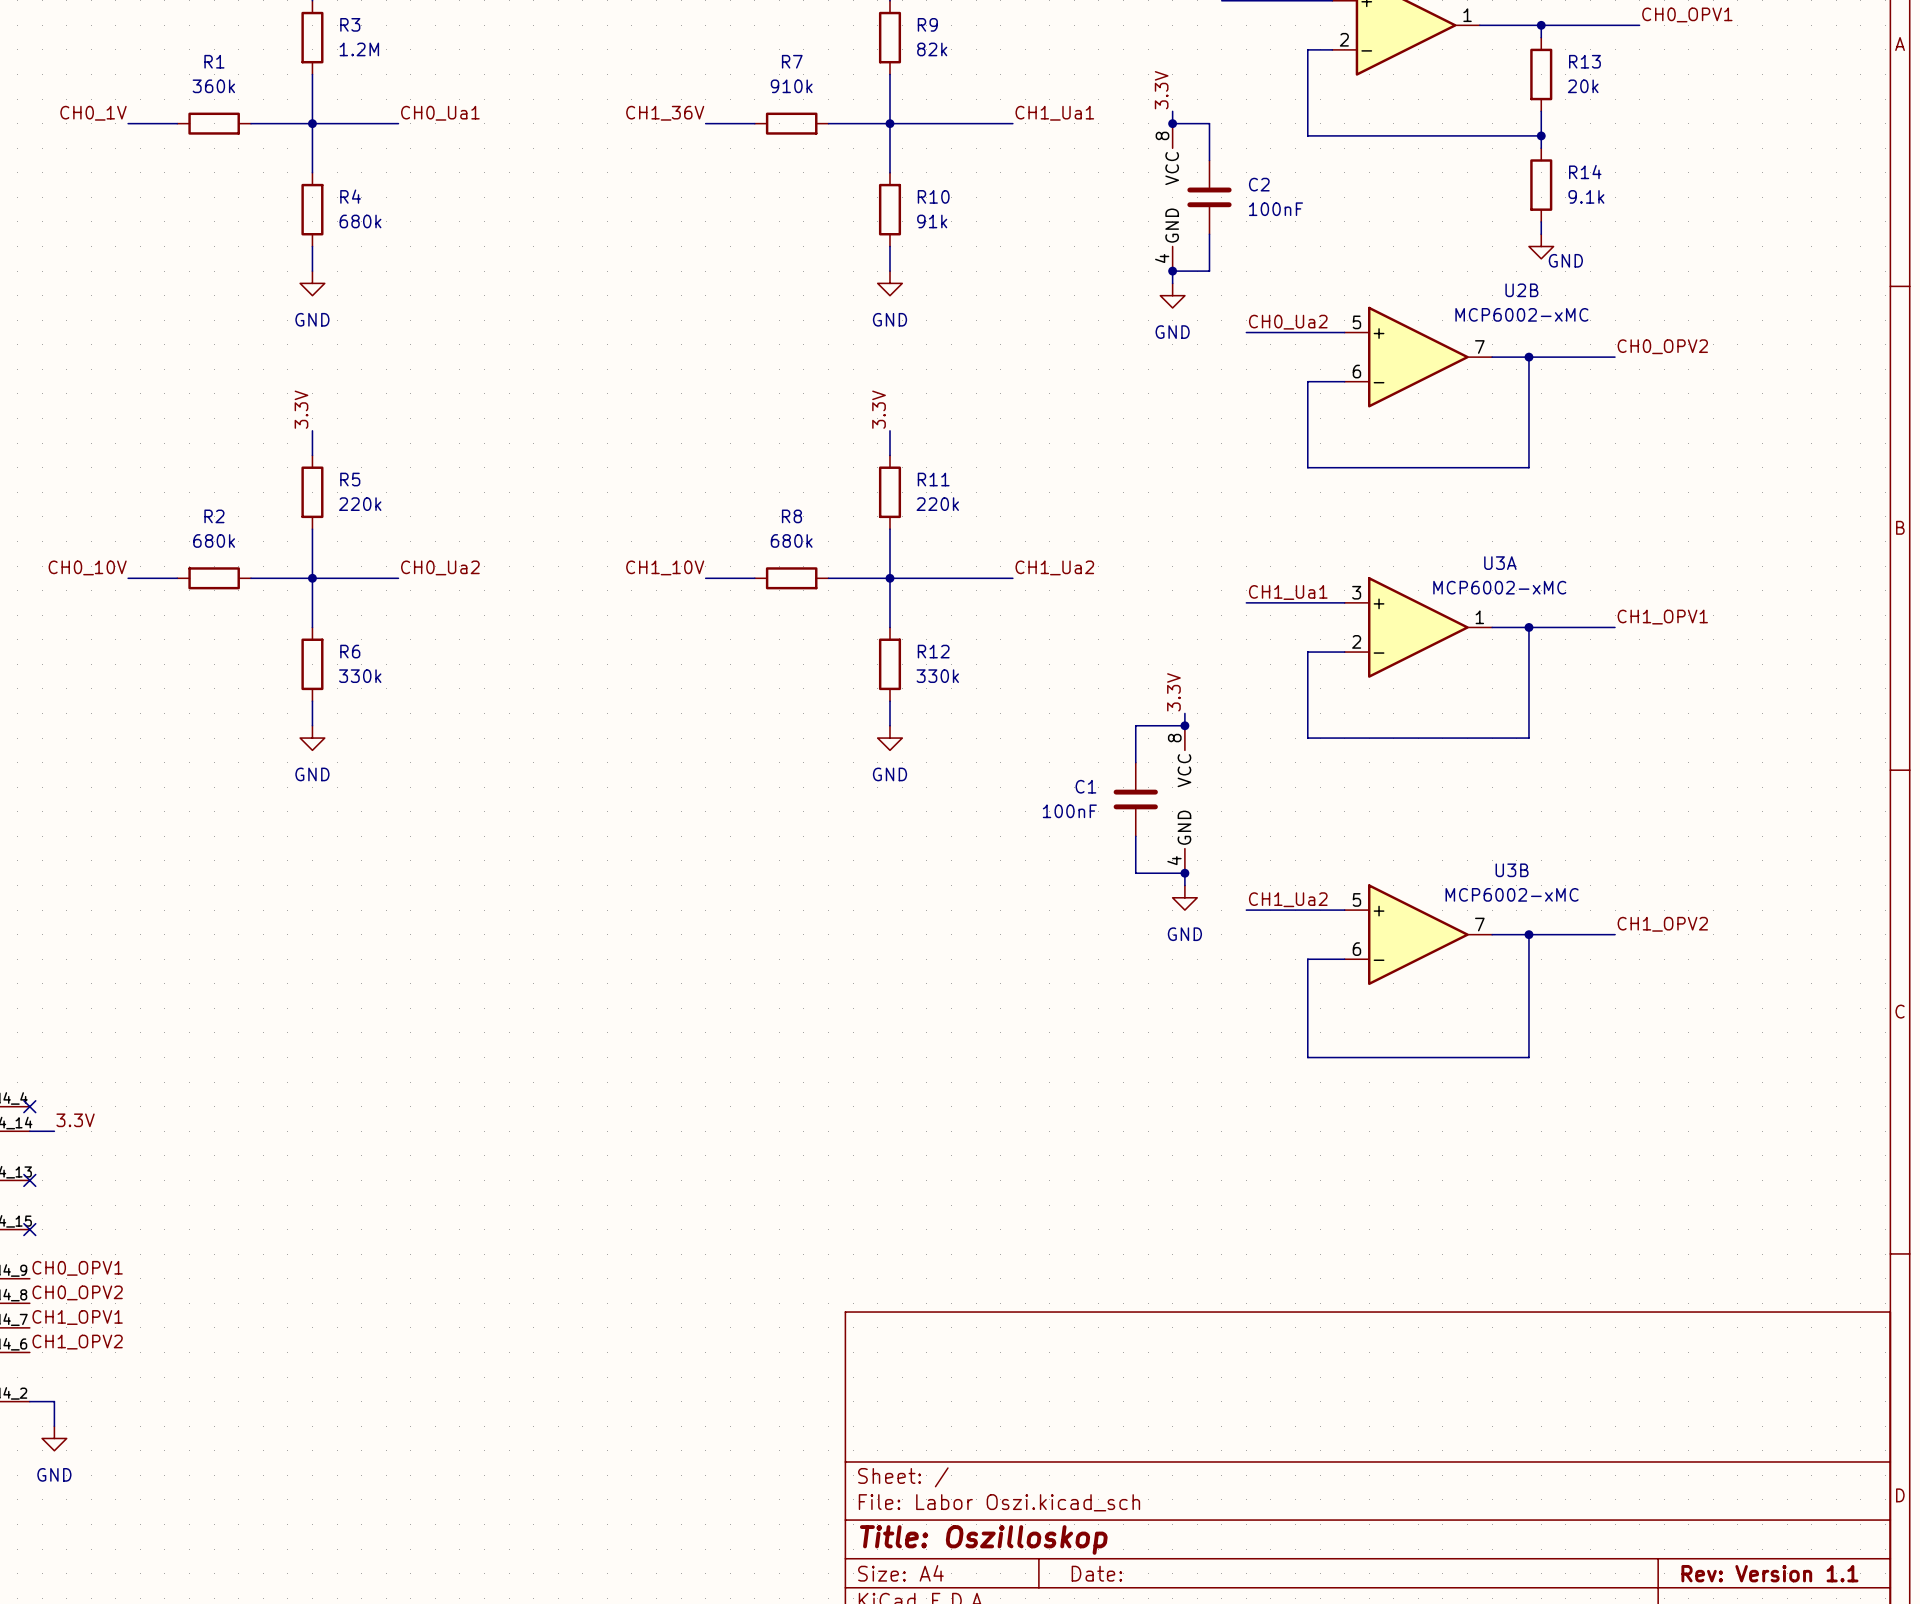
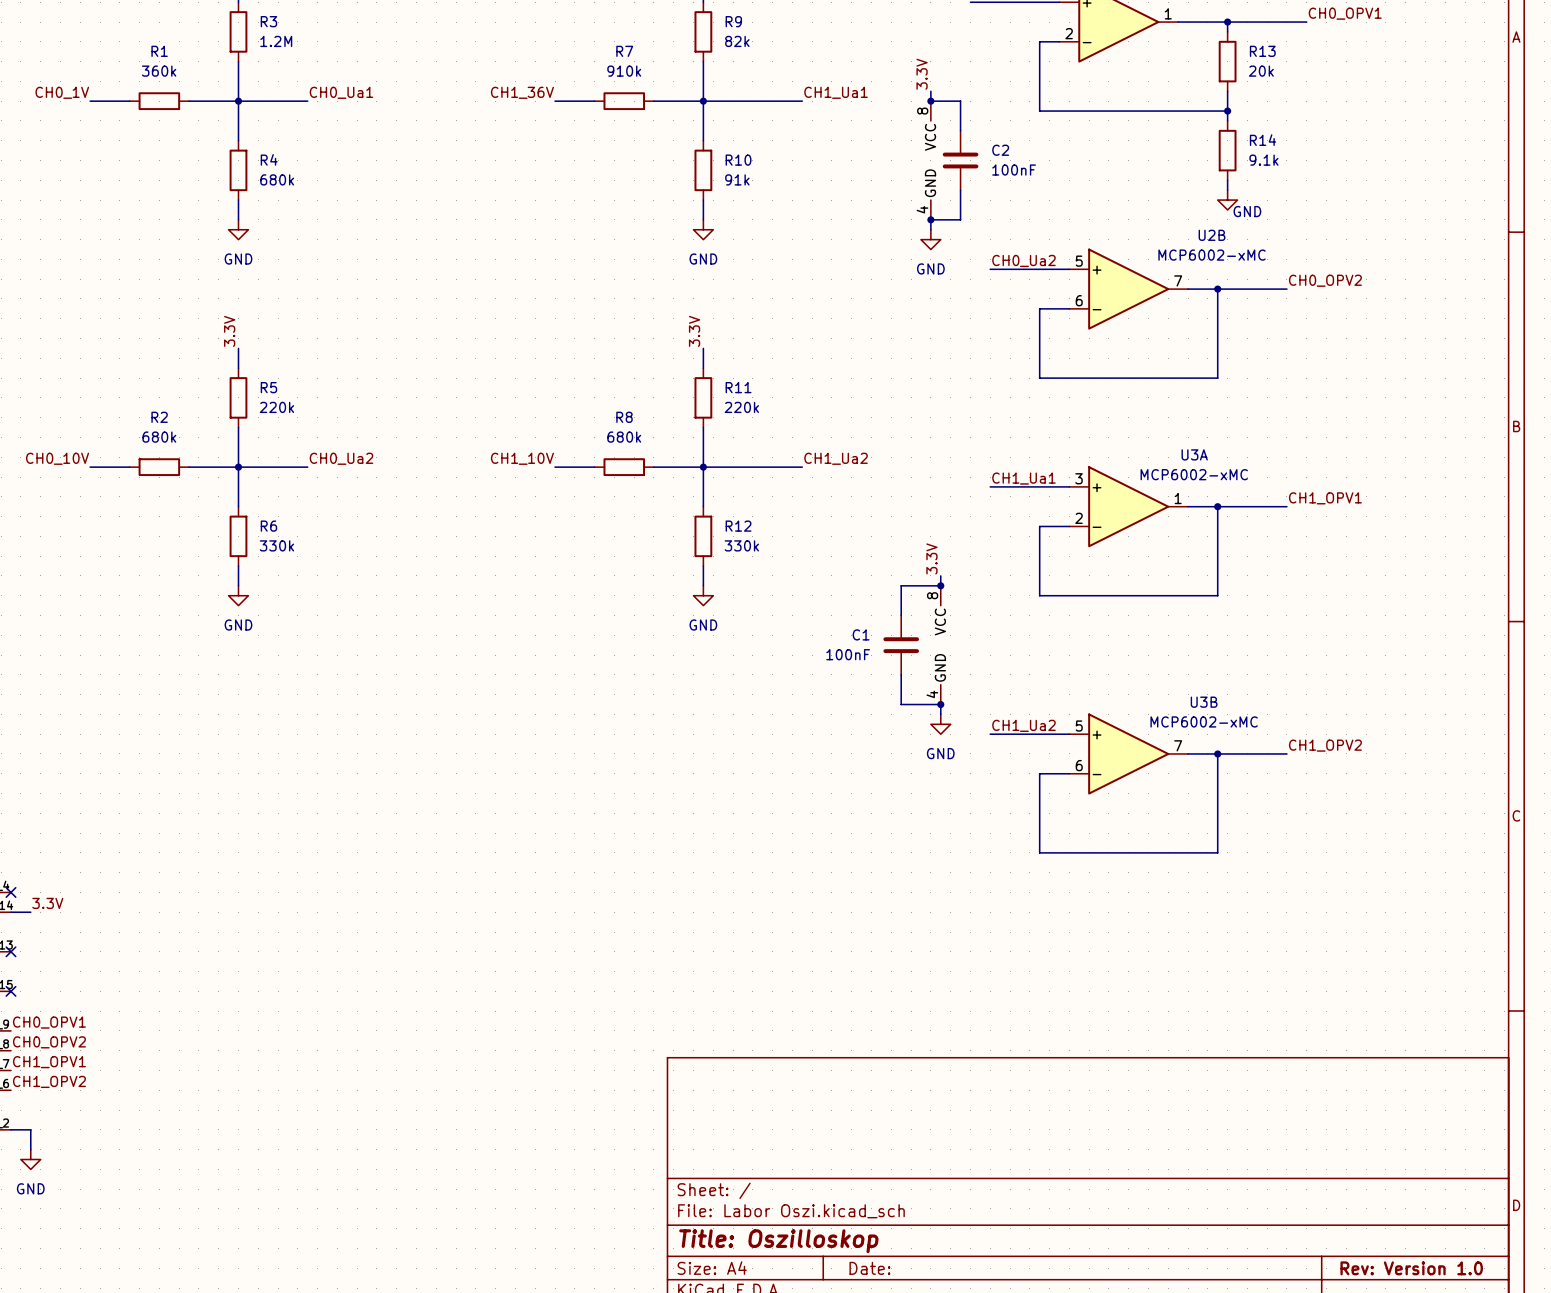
title block: Rev: Version 1.1 (1769, 1573) -> Rev: Version 1.0 (1411, 1268)

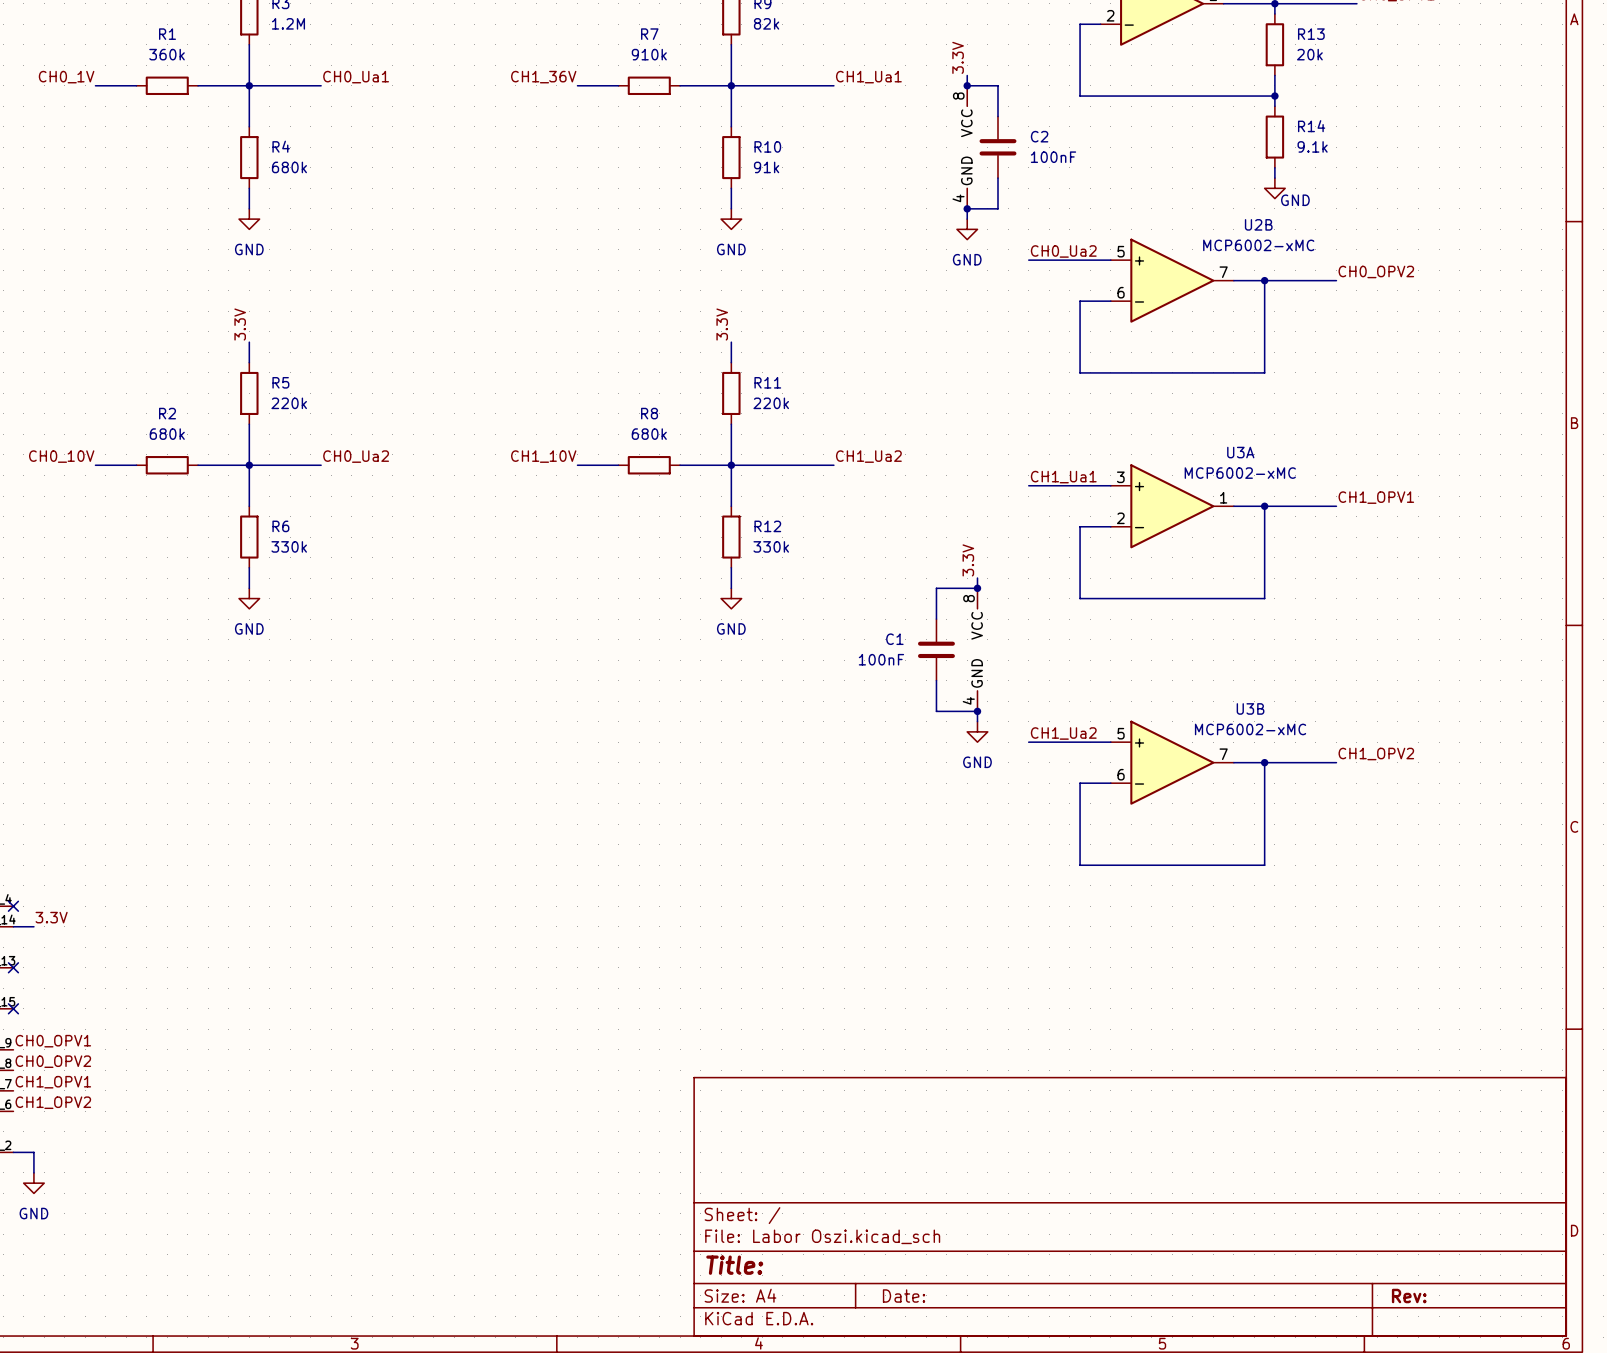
title block: Title: Oszilloskop (778, 1241) -> Title: (734, 1265)
title block: Rev: Version 1.0 (1411, 1268) -> Rev: (1409, 1296)

